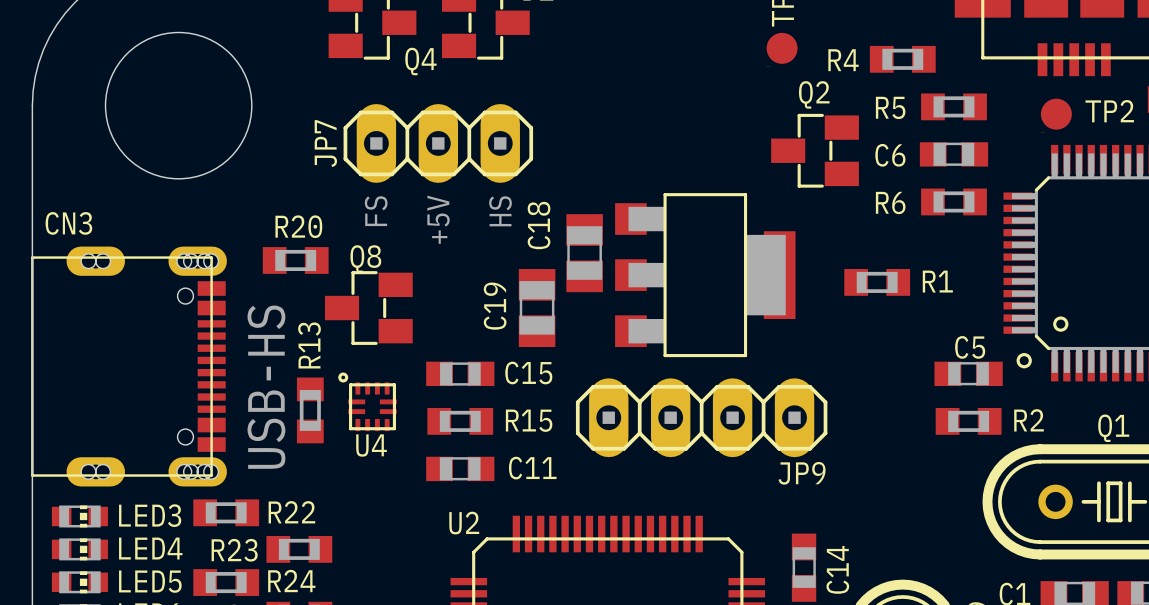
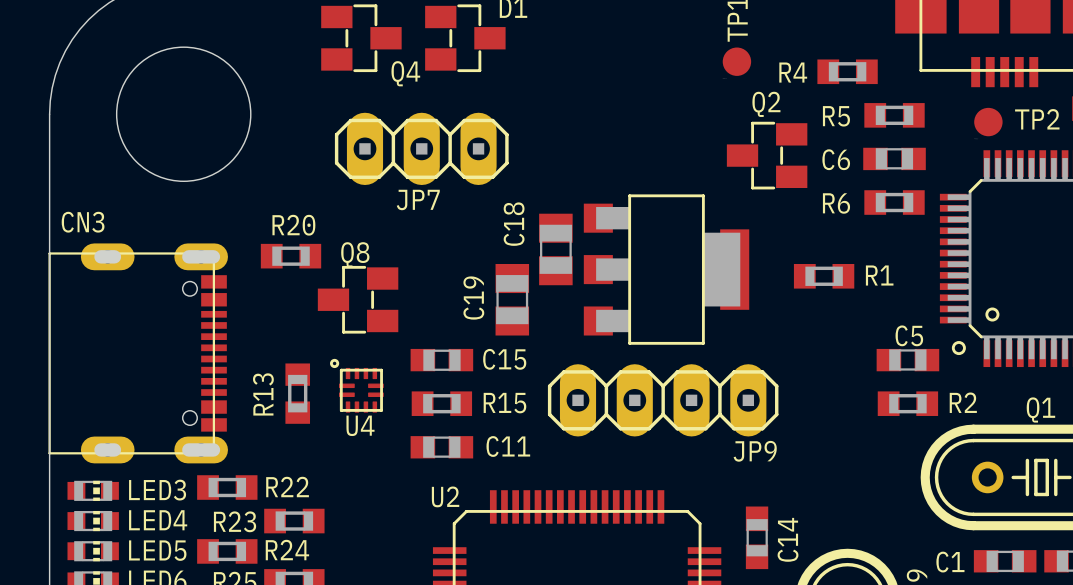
JP7 name rotation: 0° (325, 143) -> 90° clockwise (418, 199)
JP7 name position: JP7 (325, 143) -> JP7 (418, 199)
text: FS (376, 211) -> none
text: HS (500, 211) -> none
text: +5V (438, 219) -> none
CN3 footprint: [31, 246, 227, 487] -> [48, 243, 228, 464]
R13 name position: R13 (309, 345) -> R13 (263, 394)
R13 footprint: [296, 377, 324, 444] -> [285, 363, 311, 424]
text: USB-HS (266, 387) -> none

